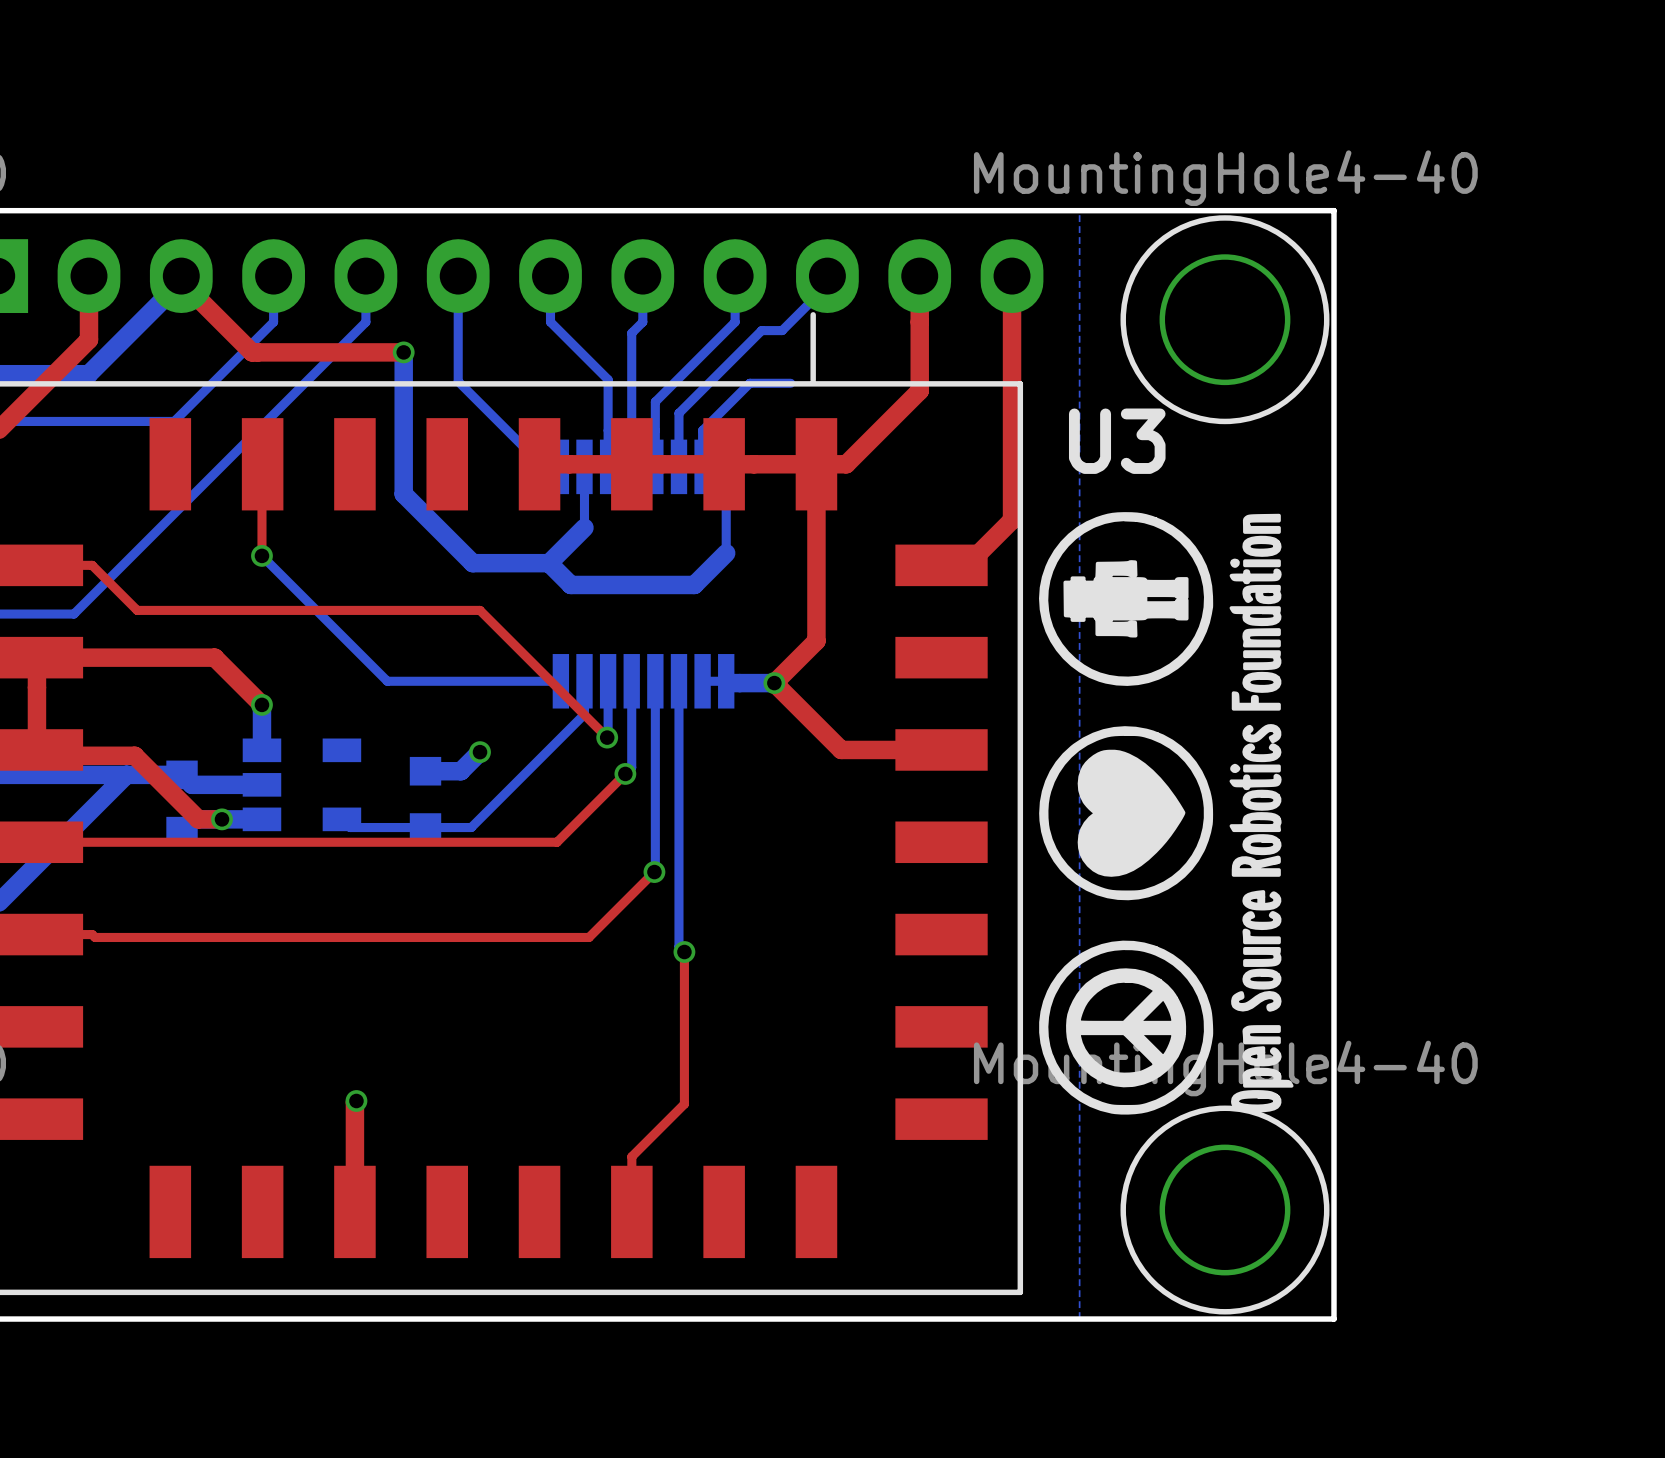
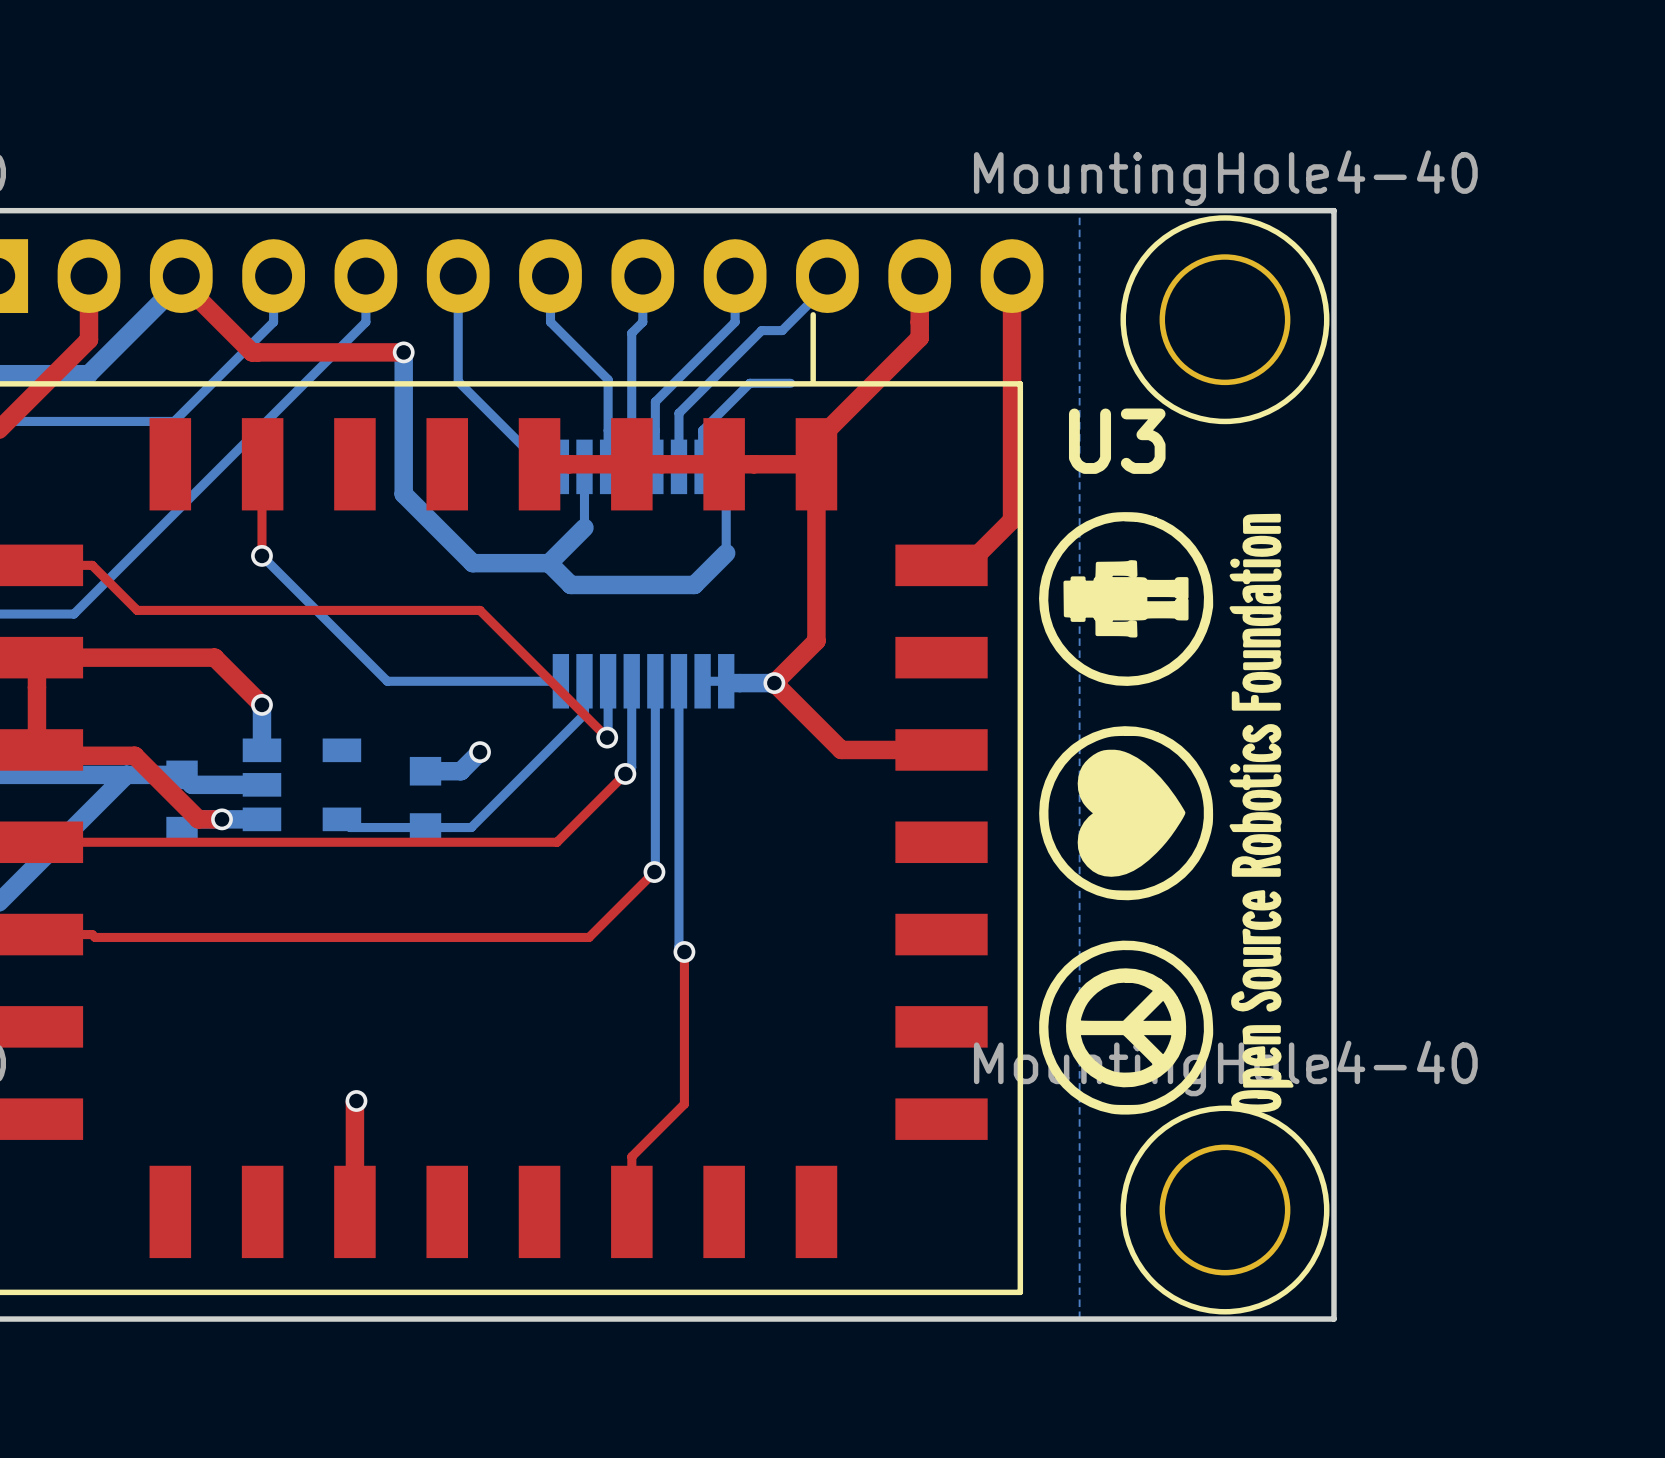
top track: (919, 337) (919, 390) (846, 464) (816, 464) -> (919, 337) (816, 441) (816, 464)

